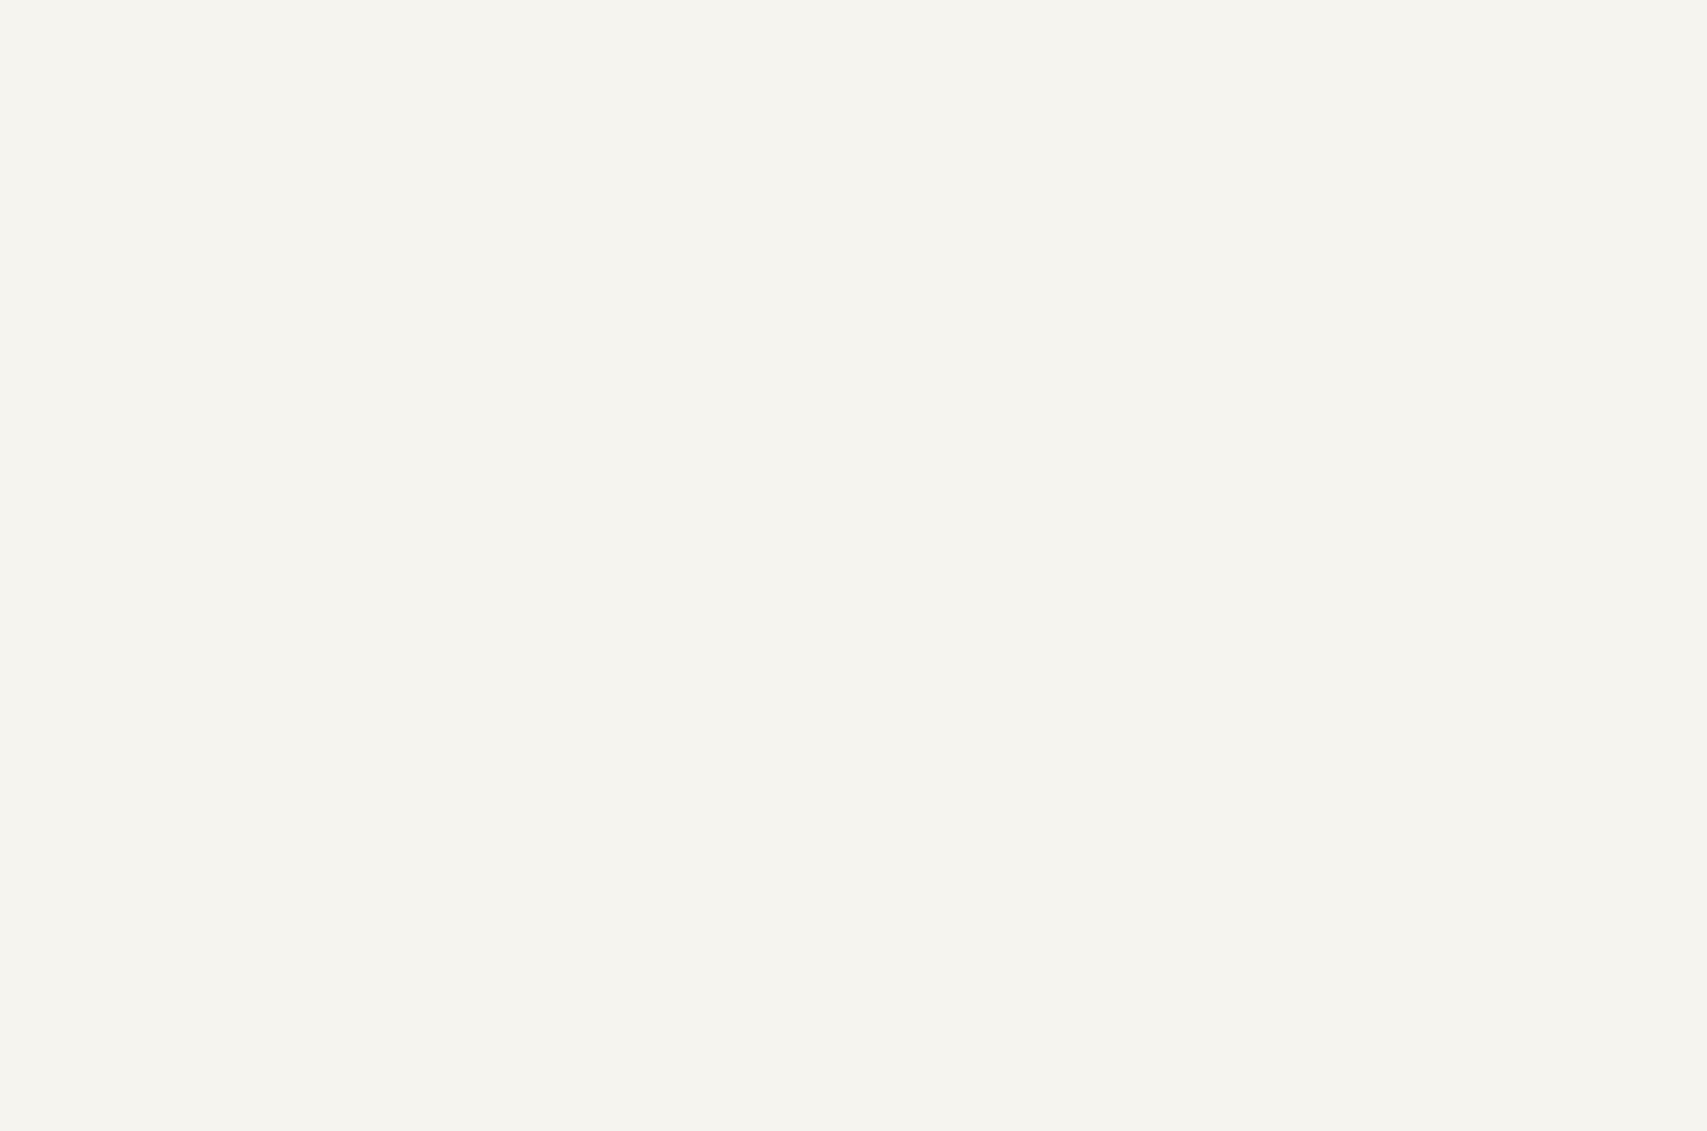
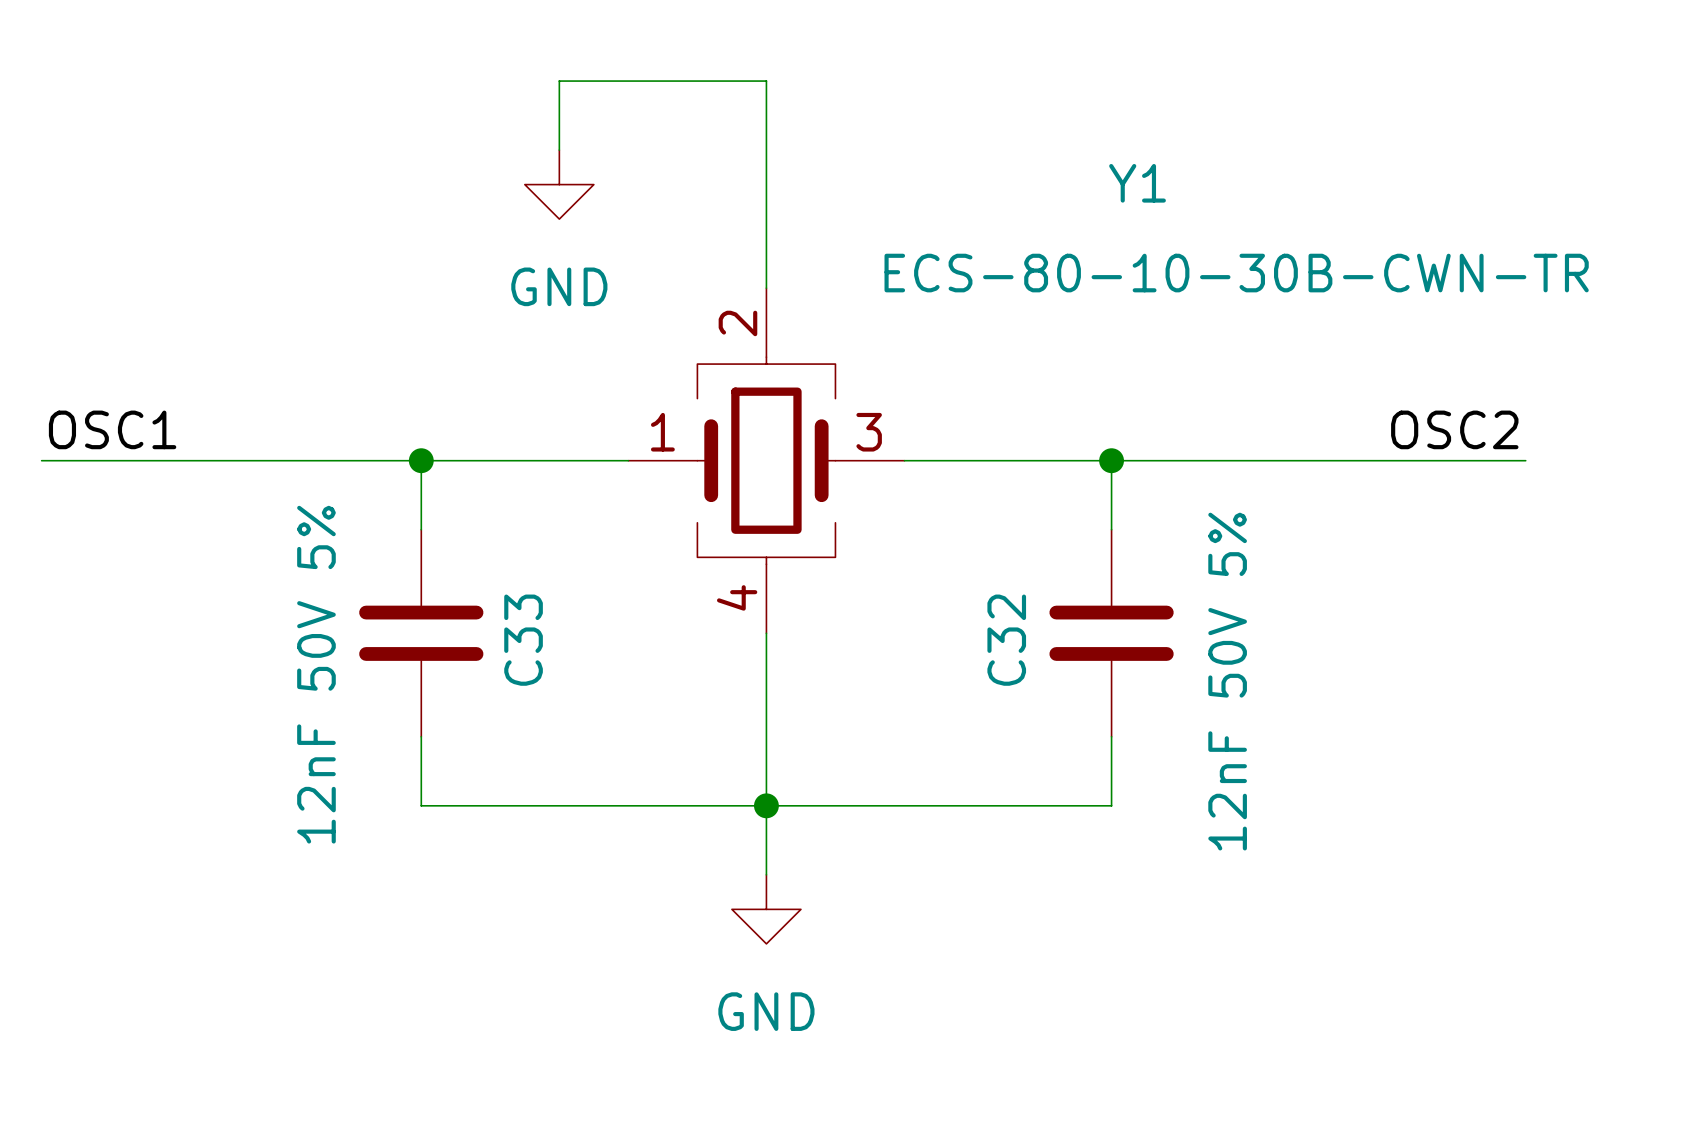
wire: none -> (559, 150) (559, 81) (766, 81) (766, 288)
power symbol: none -> GND (559, 184)
label: none -> OSC1 (112, 429)
label: none -> OSC2 (1454, 429)
wire: none -> (41, 460) (628, 460)
wire: none -> (421, 460) (421, 529)
junction: none -> (421, 460)
Y1: none -> ECS-80-10-30B-CWN-TR (766, 460)
wire: none -> (904, 460) (1525, 460)
wire: none -> (1111, 460) (1111, 529)
junction: none -> (1111, 460)
C33: none -> 12nF 50V 5% (421, 633)
wire: none -> (766, 633) (766, 874)
C32: none -> 12nF 50V 5% (1111, 633)
wire: none -> (421, 736) (421, 805) (1111, 805) (1111, 736)
junction: none -> (766, 805)
power symbol: none -> GND (766, 909)

